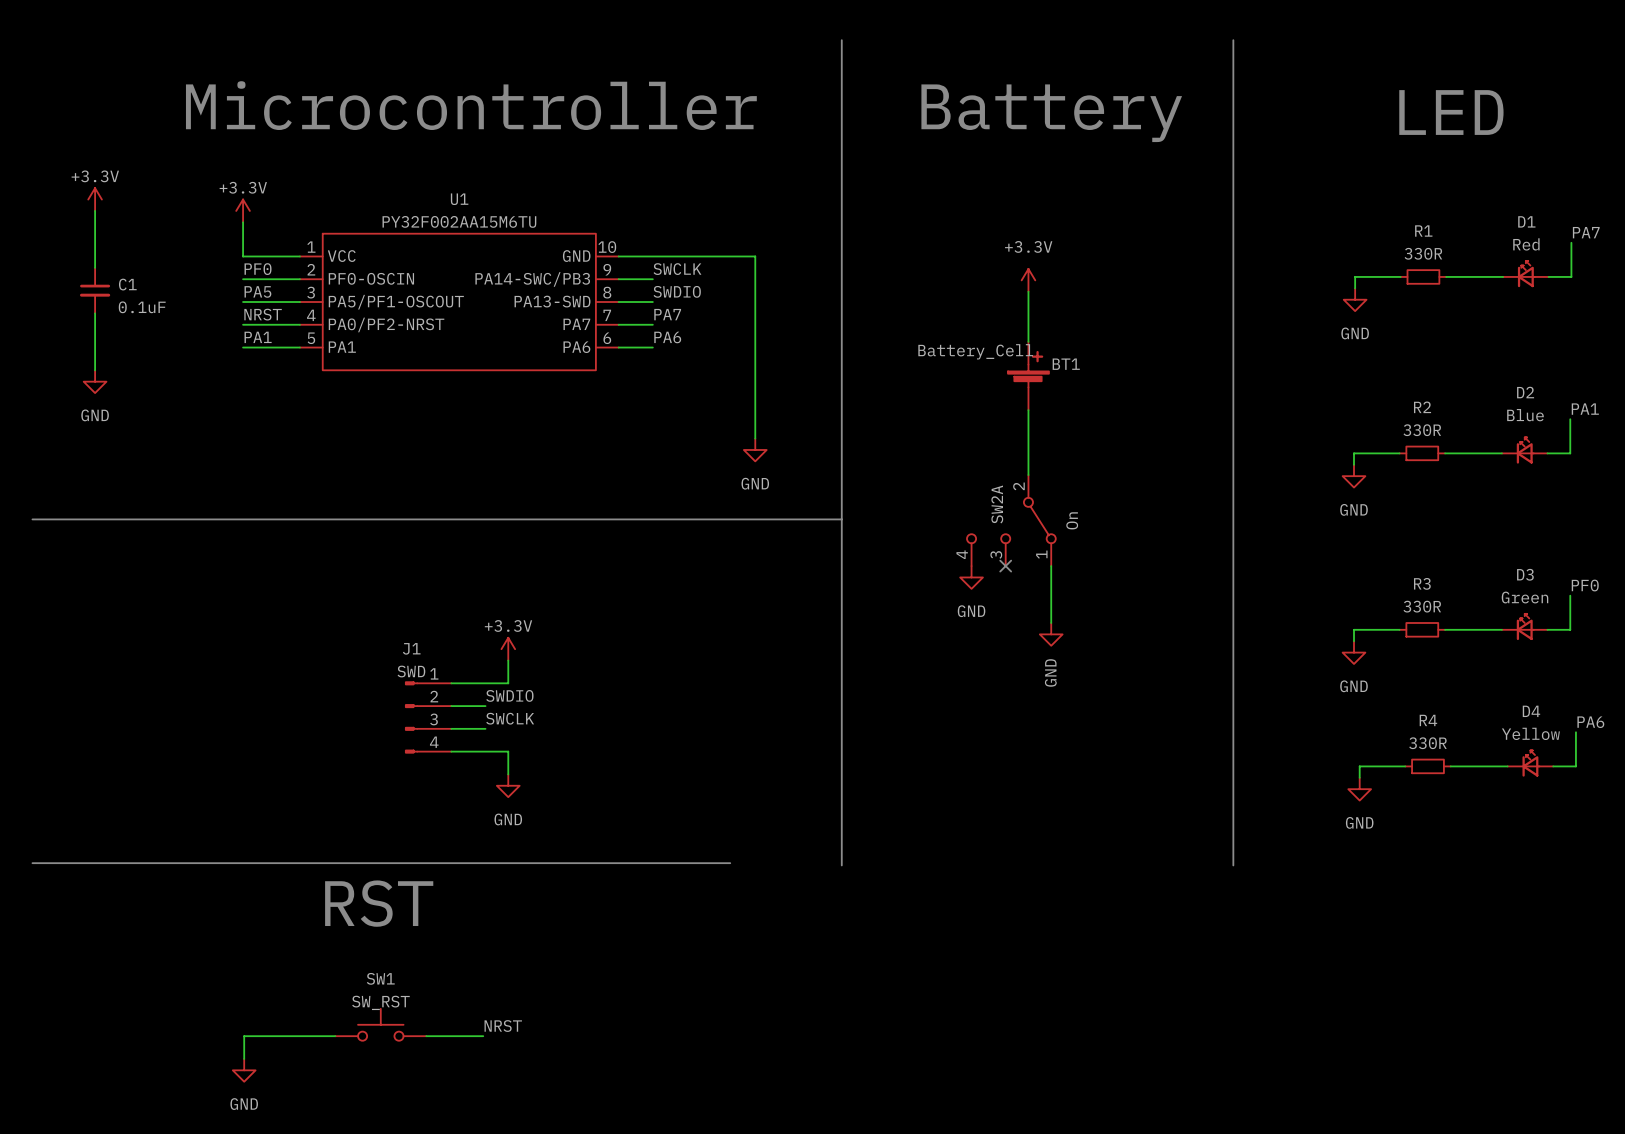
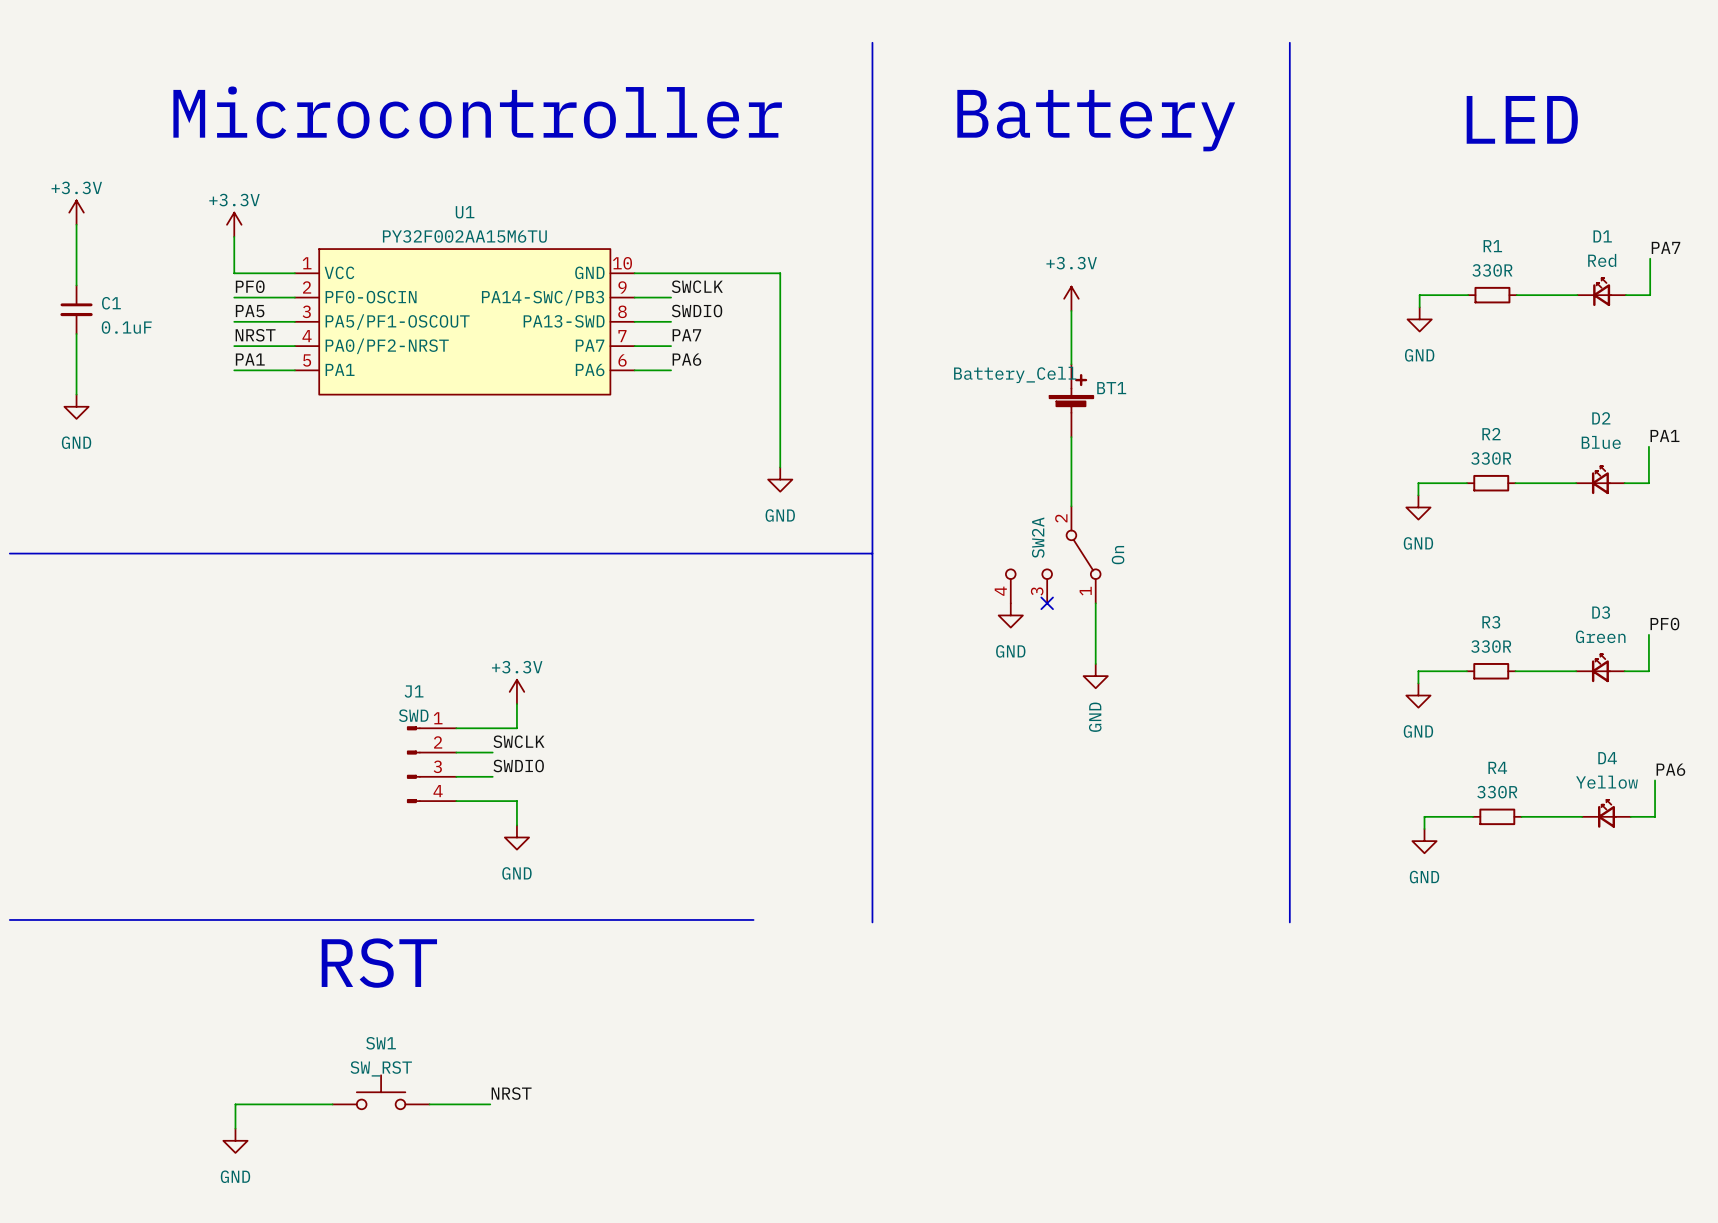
label: SWDIO (509, 695) -> SWCLK (518, 741)
label: SWCLK (510, 718) -> SWDIO (518, 765)

